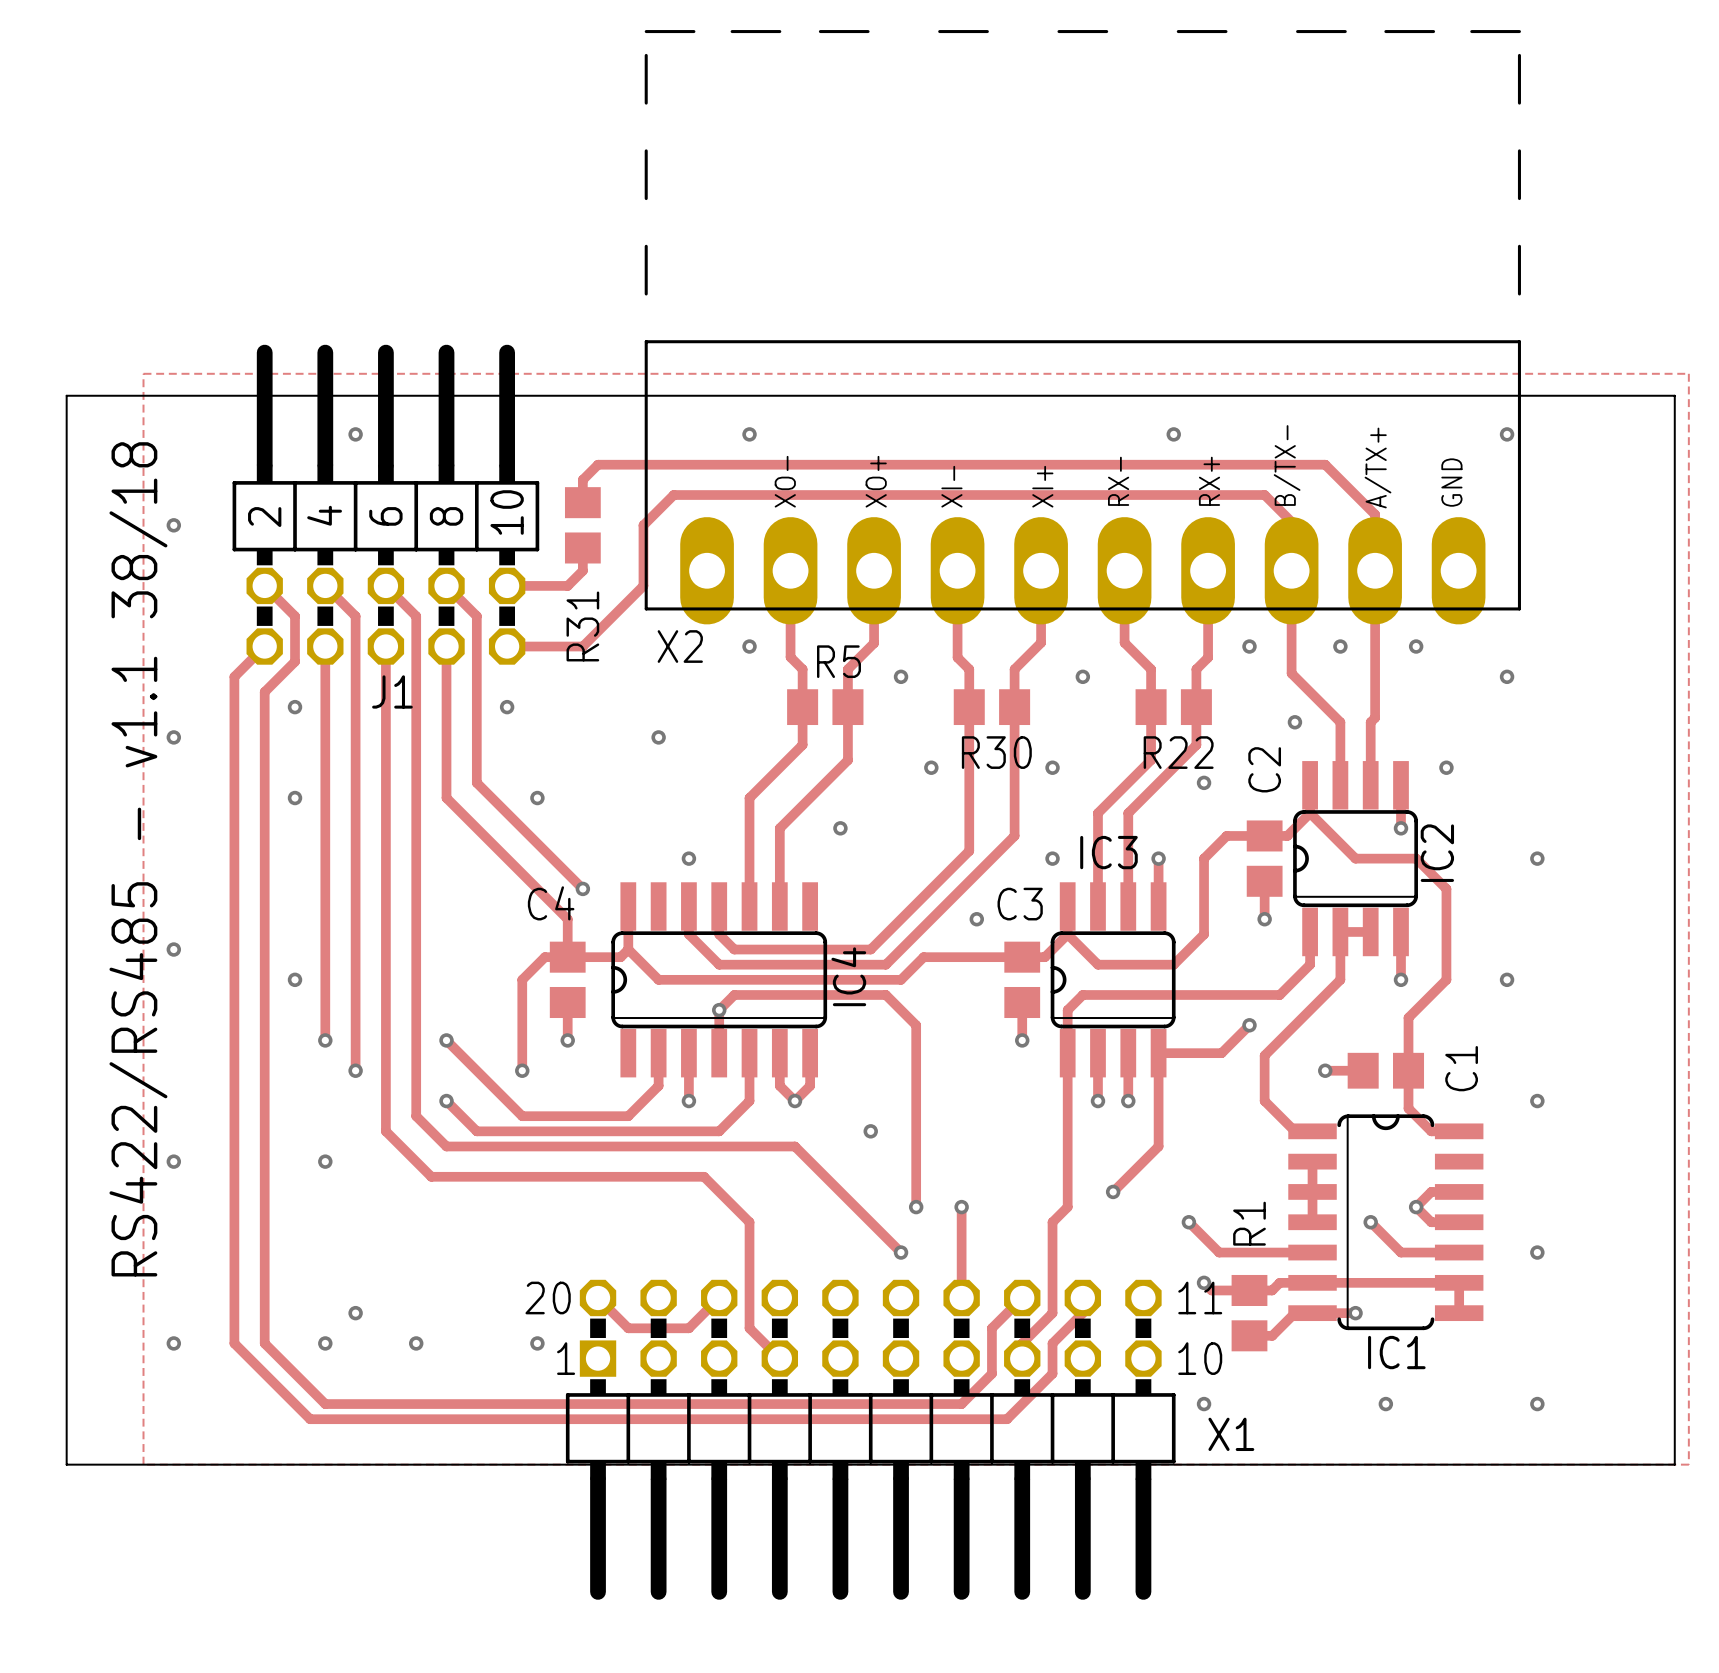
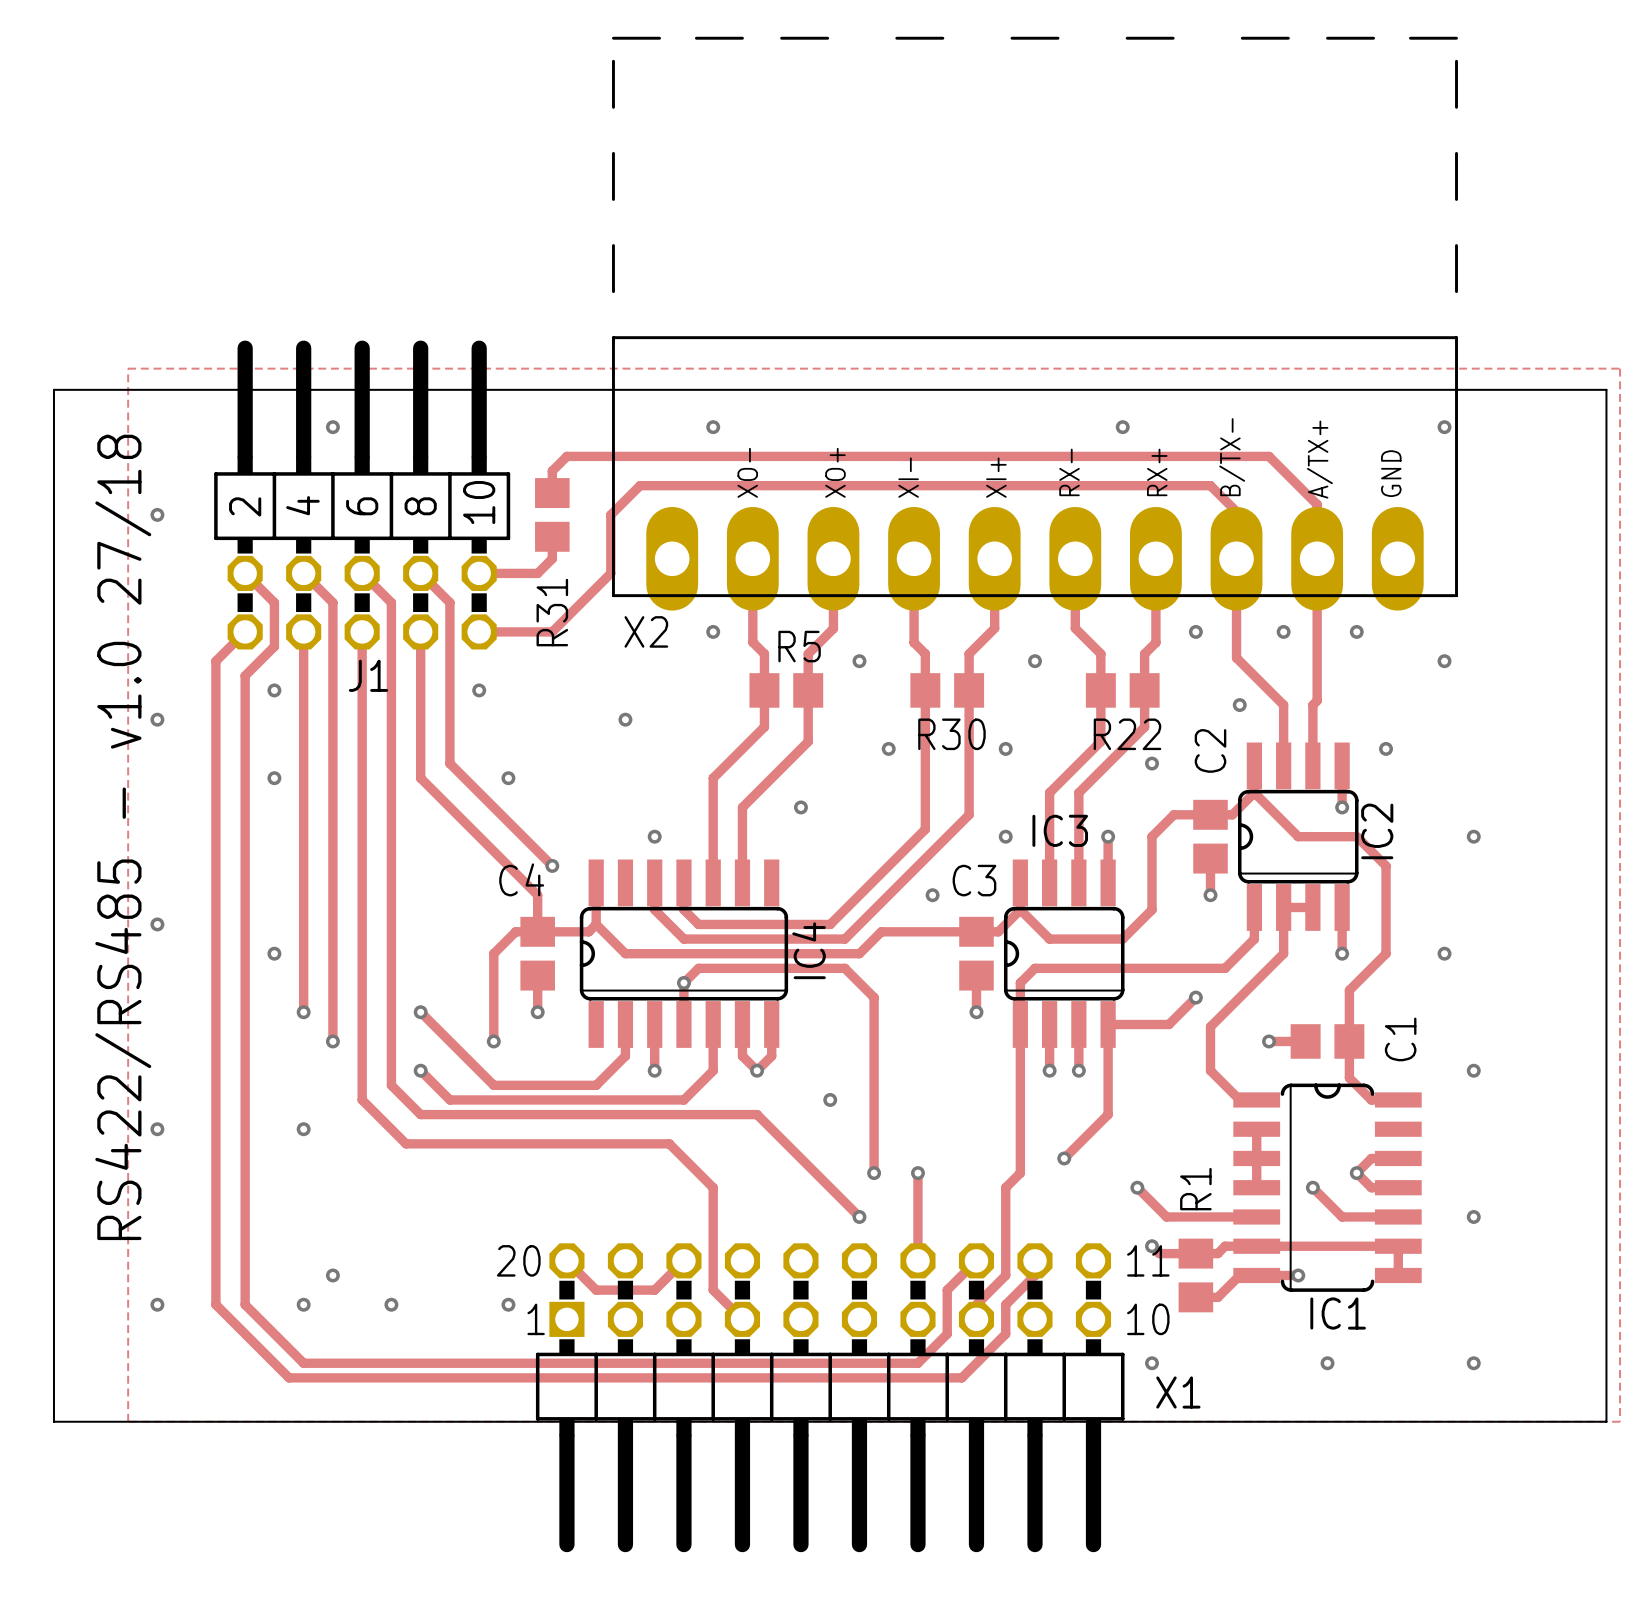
text: RS422/RS485 - v1.1 38/18 (138, 859) -> RS422/RS485 - v1.0 27/18 (123, 837)

